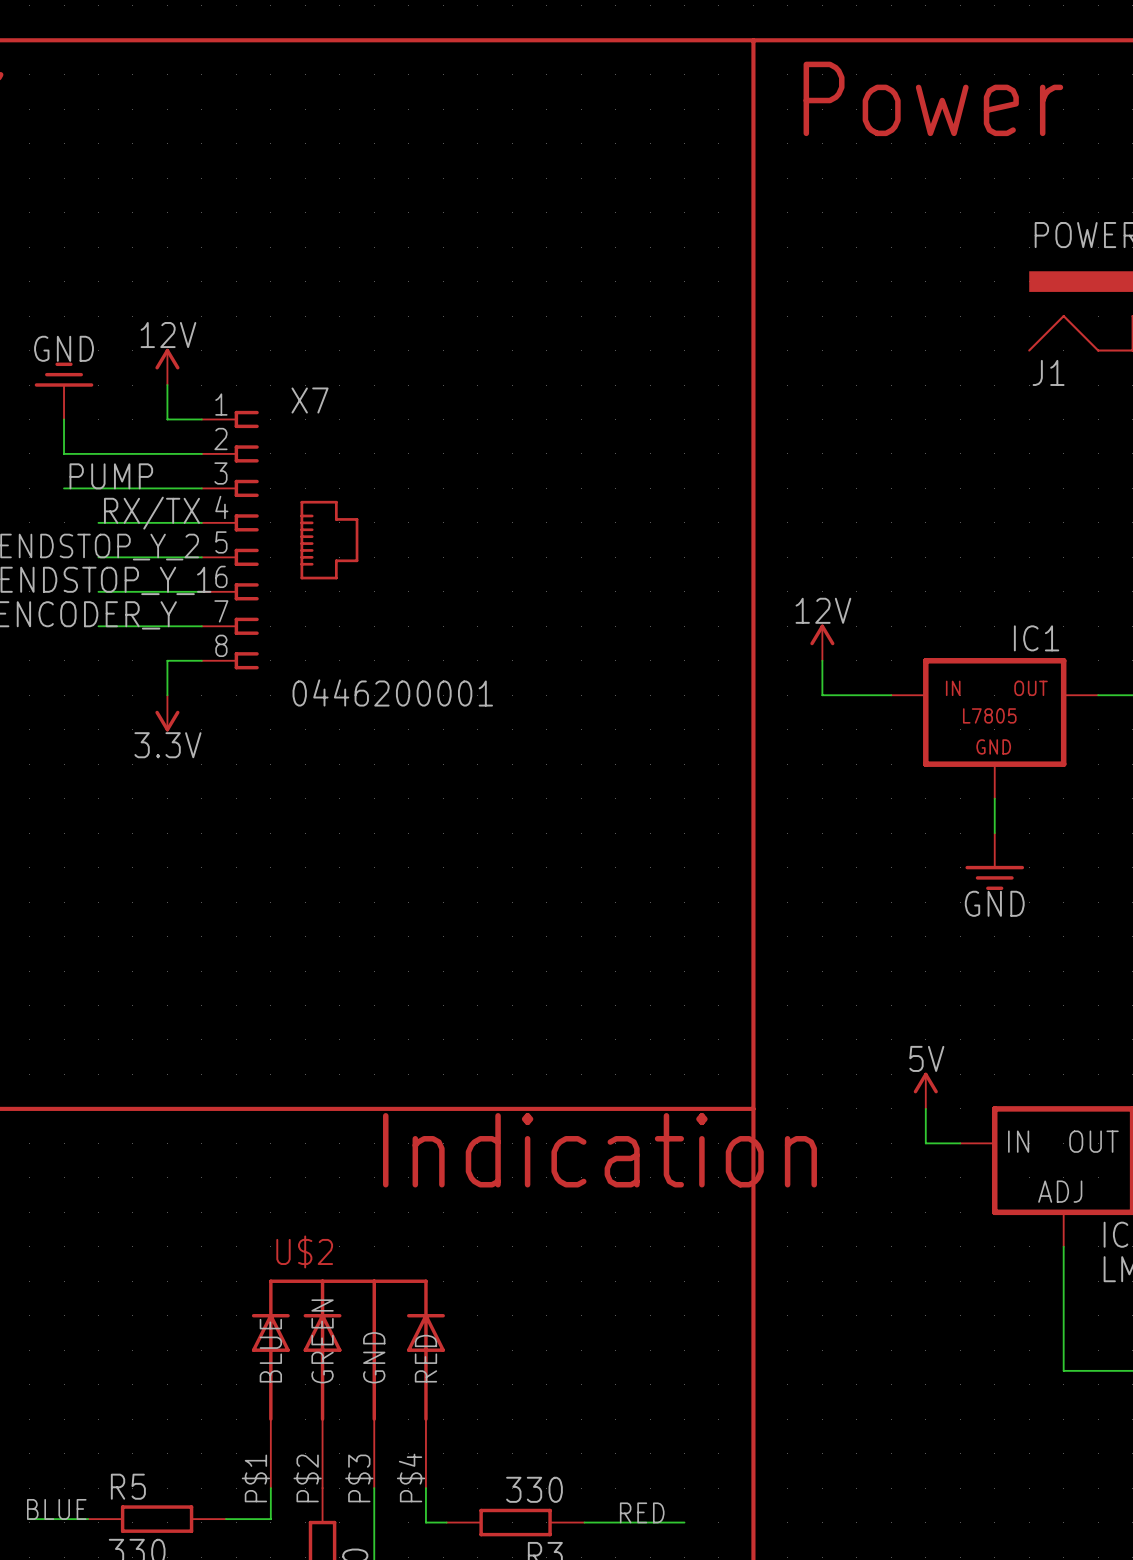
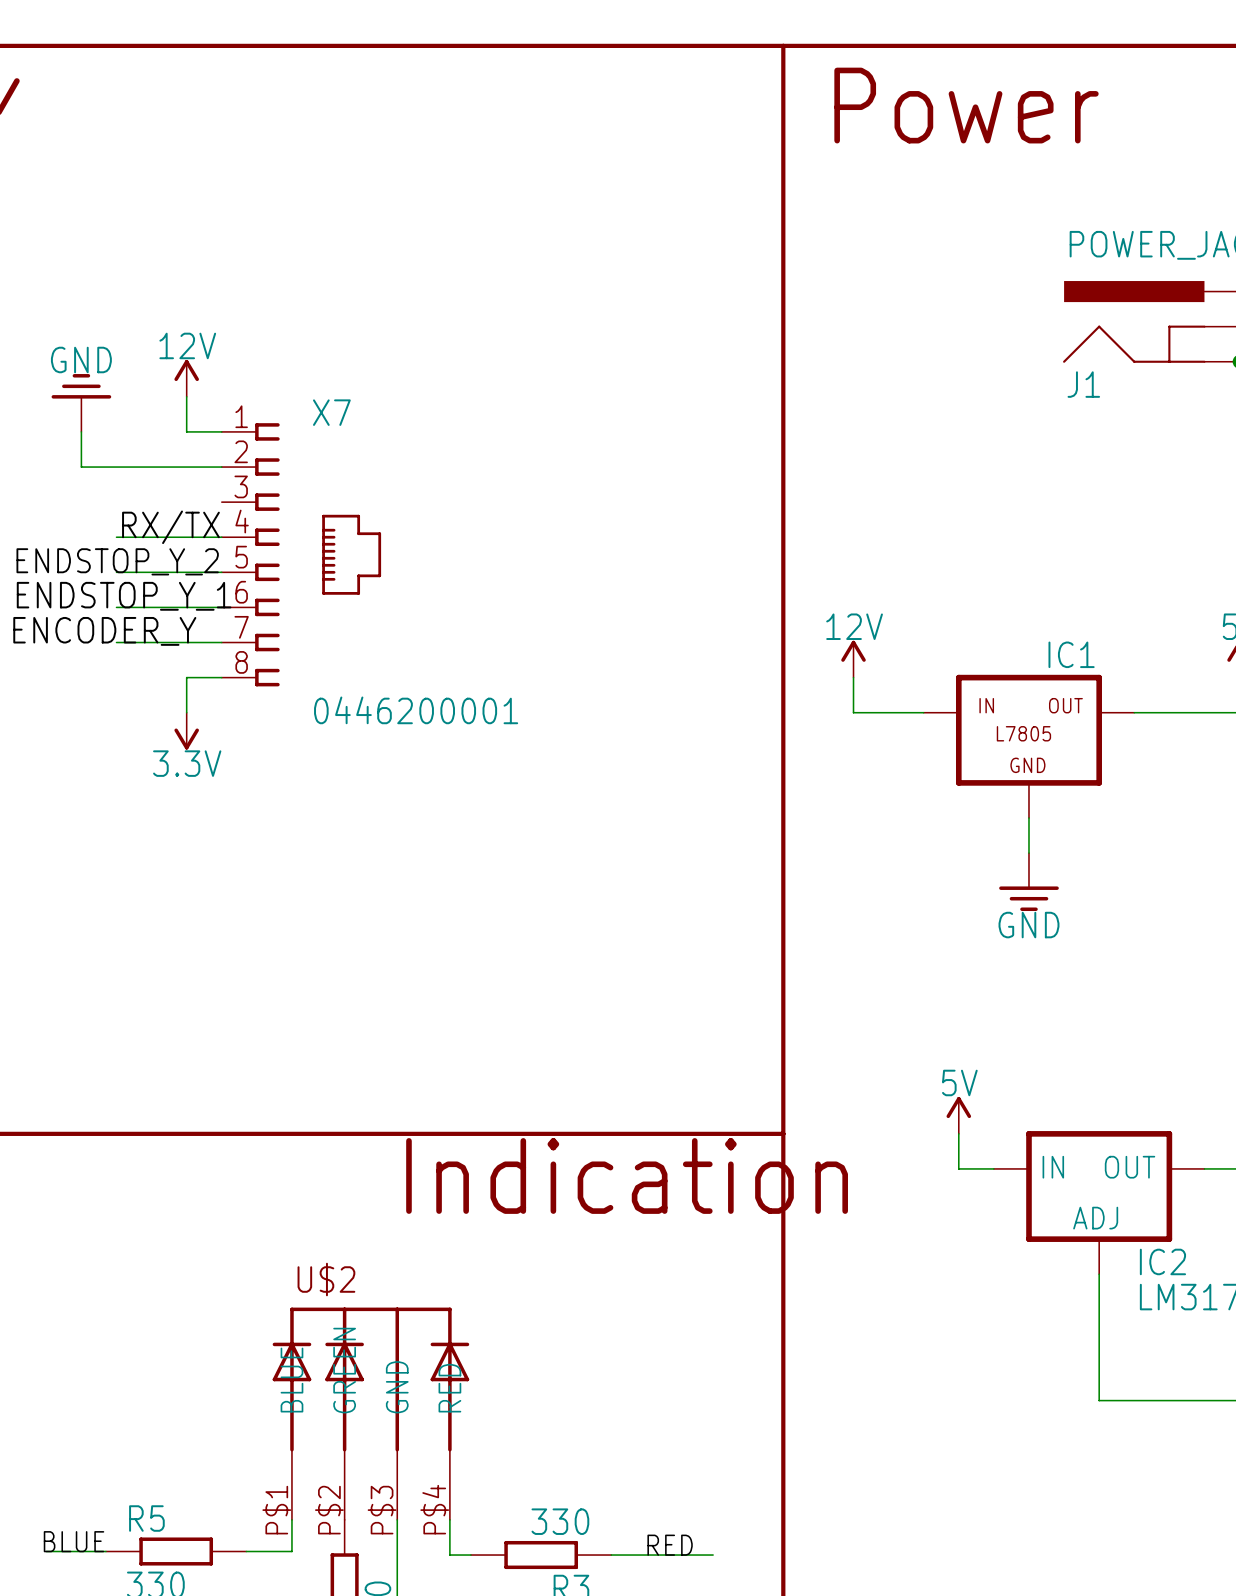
label: PUMP (111, 476) -> none
wire: (64, 488) (201, 488) -> none

